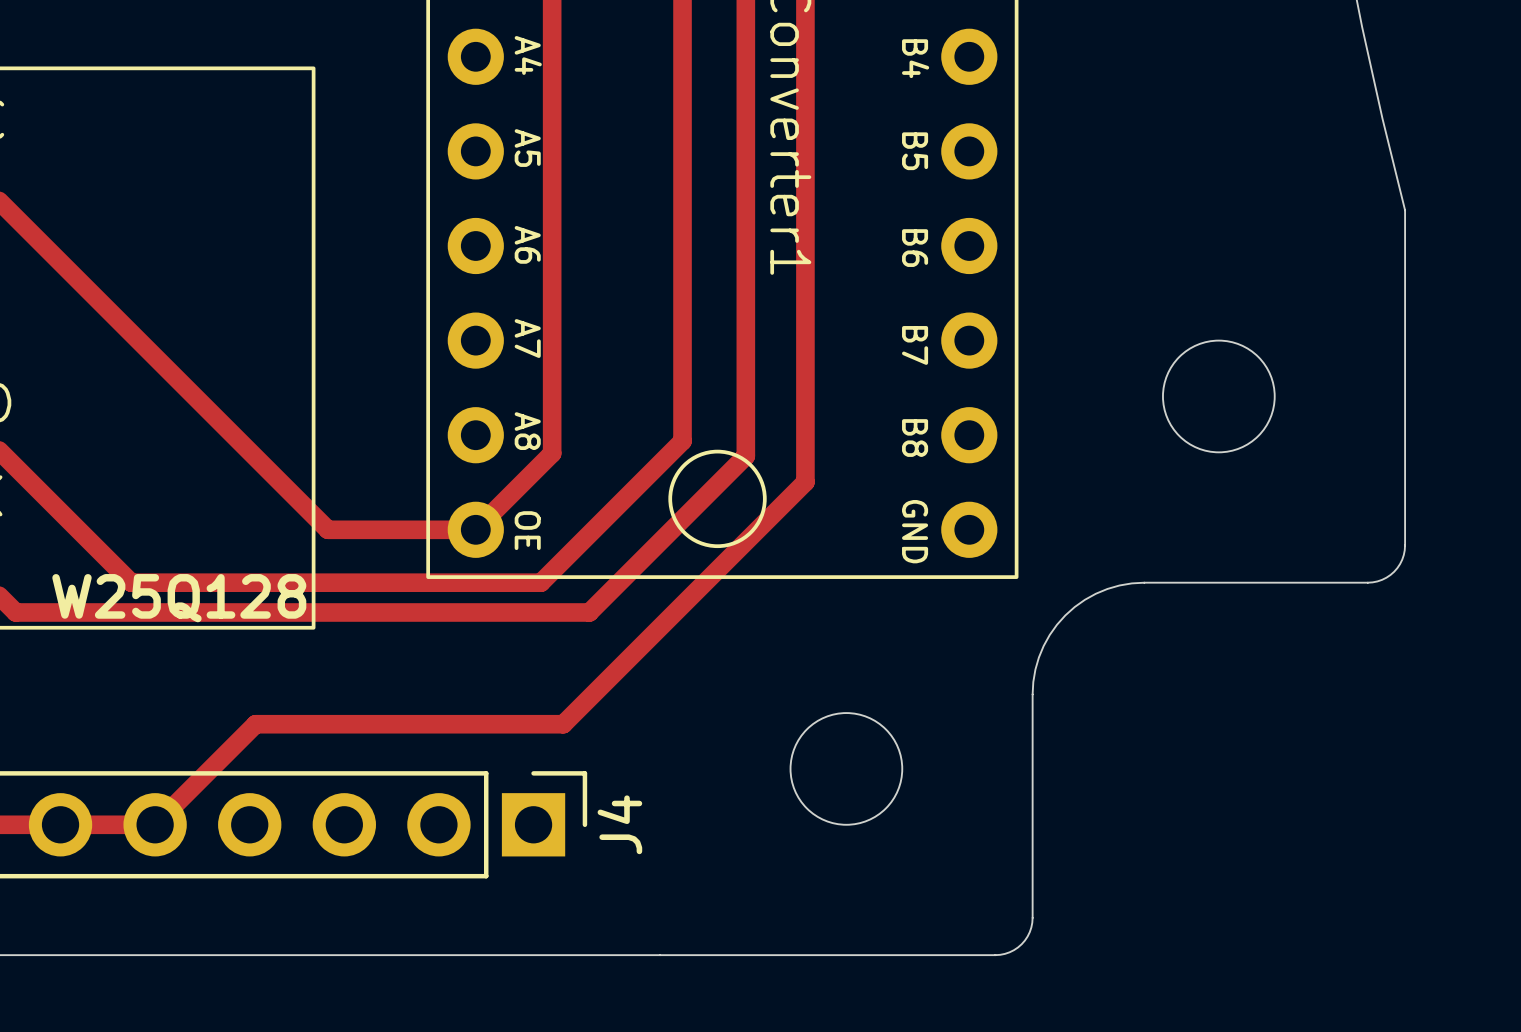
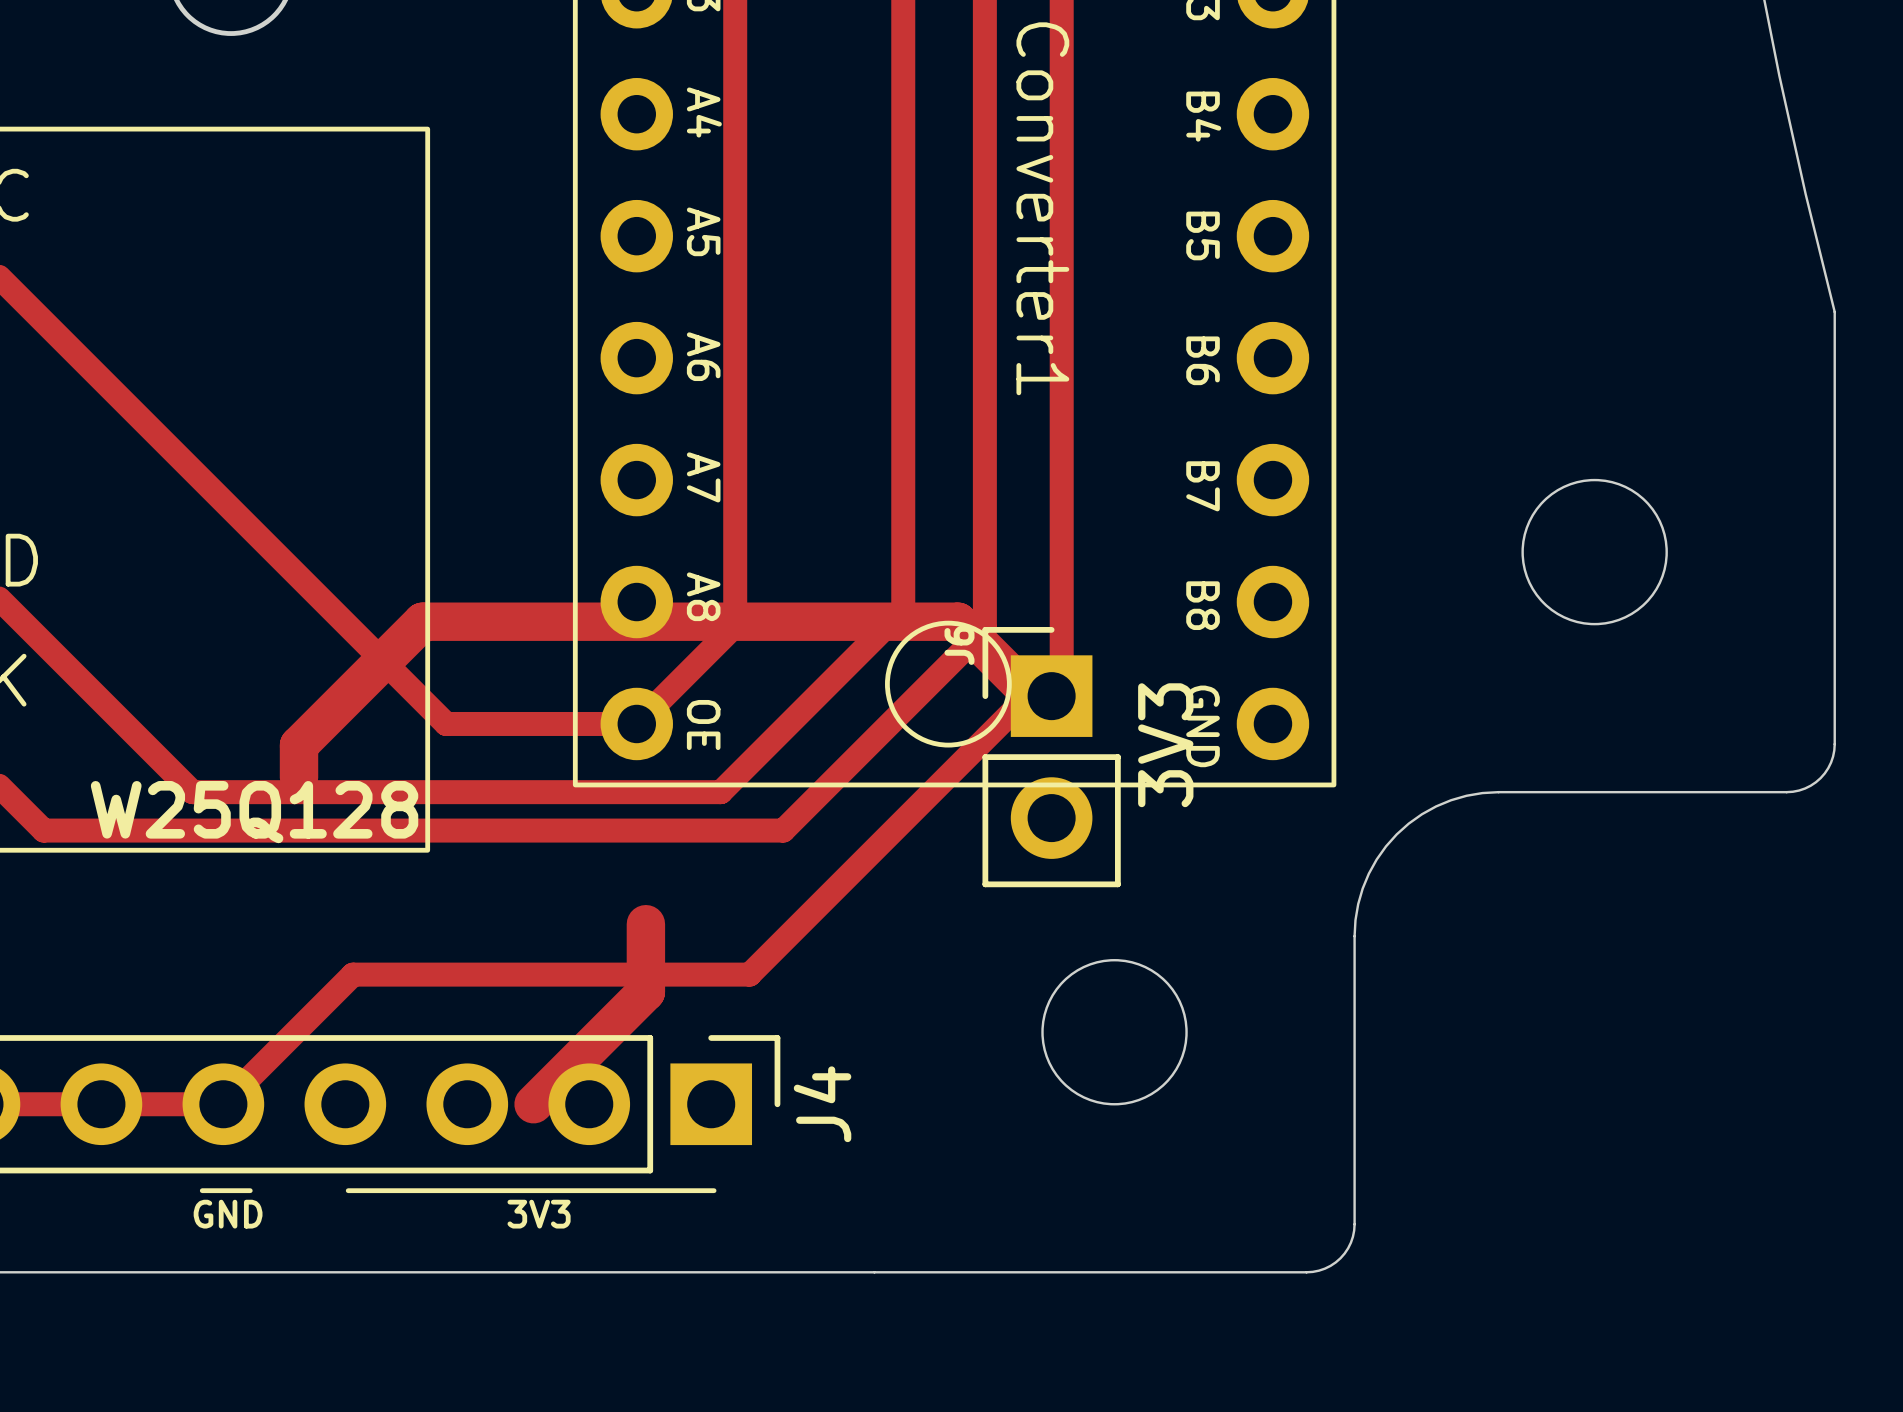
track: none -> (1050, 713) (957, 621) (422, 621) (299, 745) (299, 777)
text: none -> 3V3 (1165, 745)
J6: none -> (1051, 757)
track: none -> (645, 924) (645, 991) (533, 1104)
line: none -> (202, 1190) (250, 1190)
line: none -> (348, 1190) (714, 1190)
text: none -> GND (228, 1214)
text: none -> 3V3 (539, 1214)

